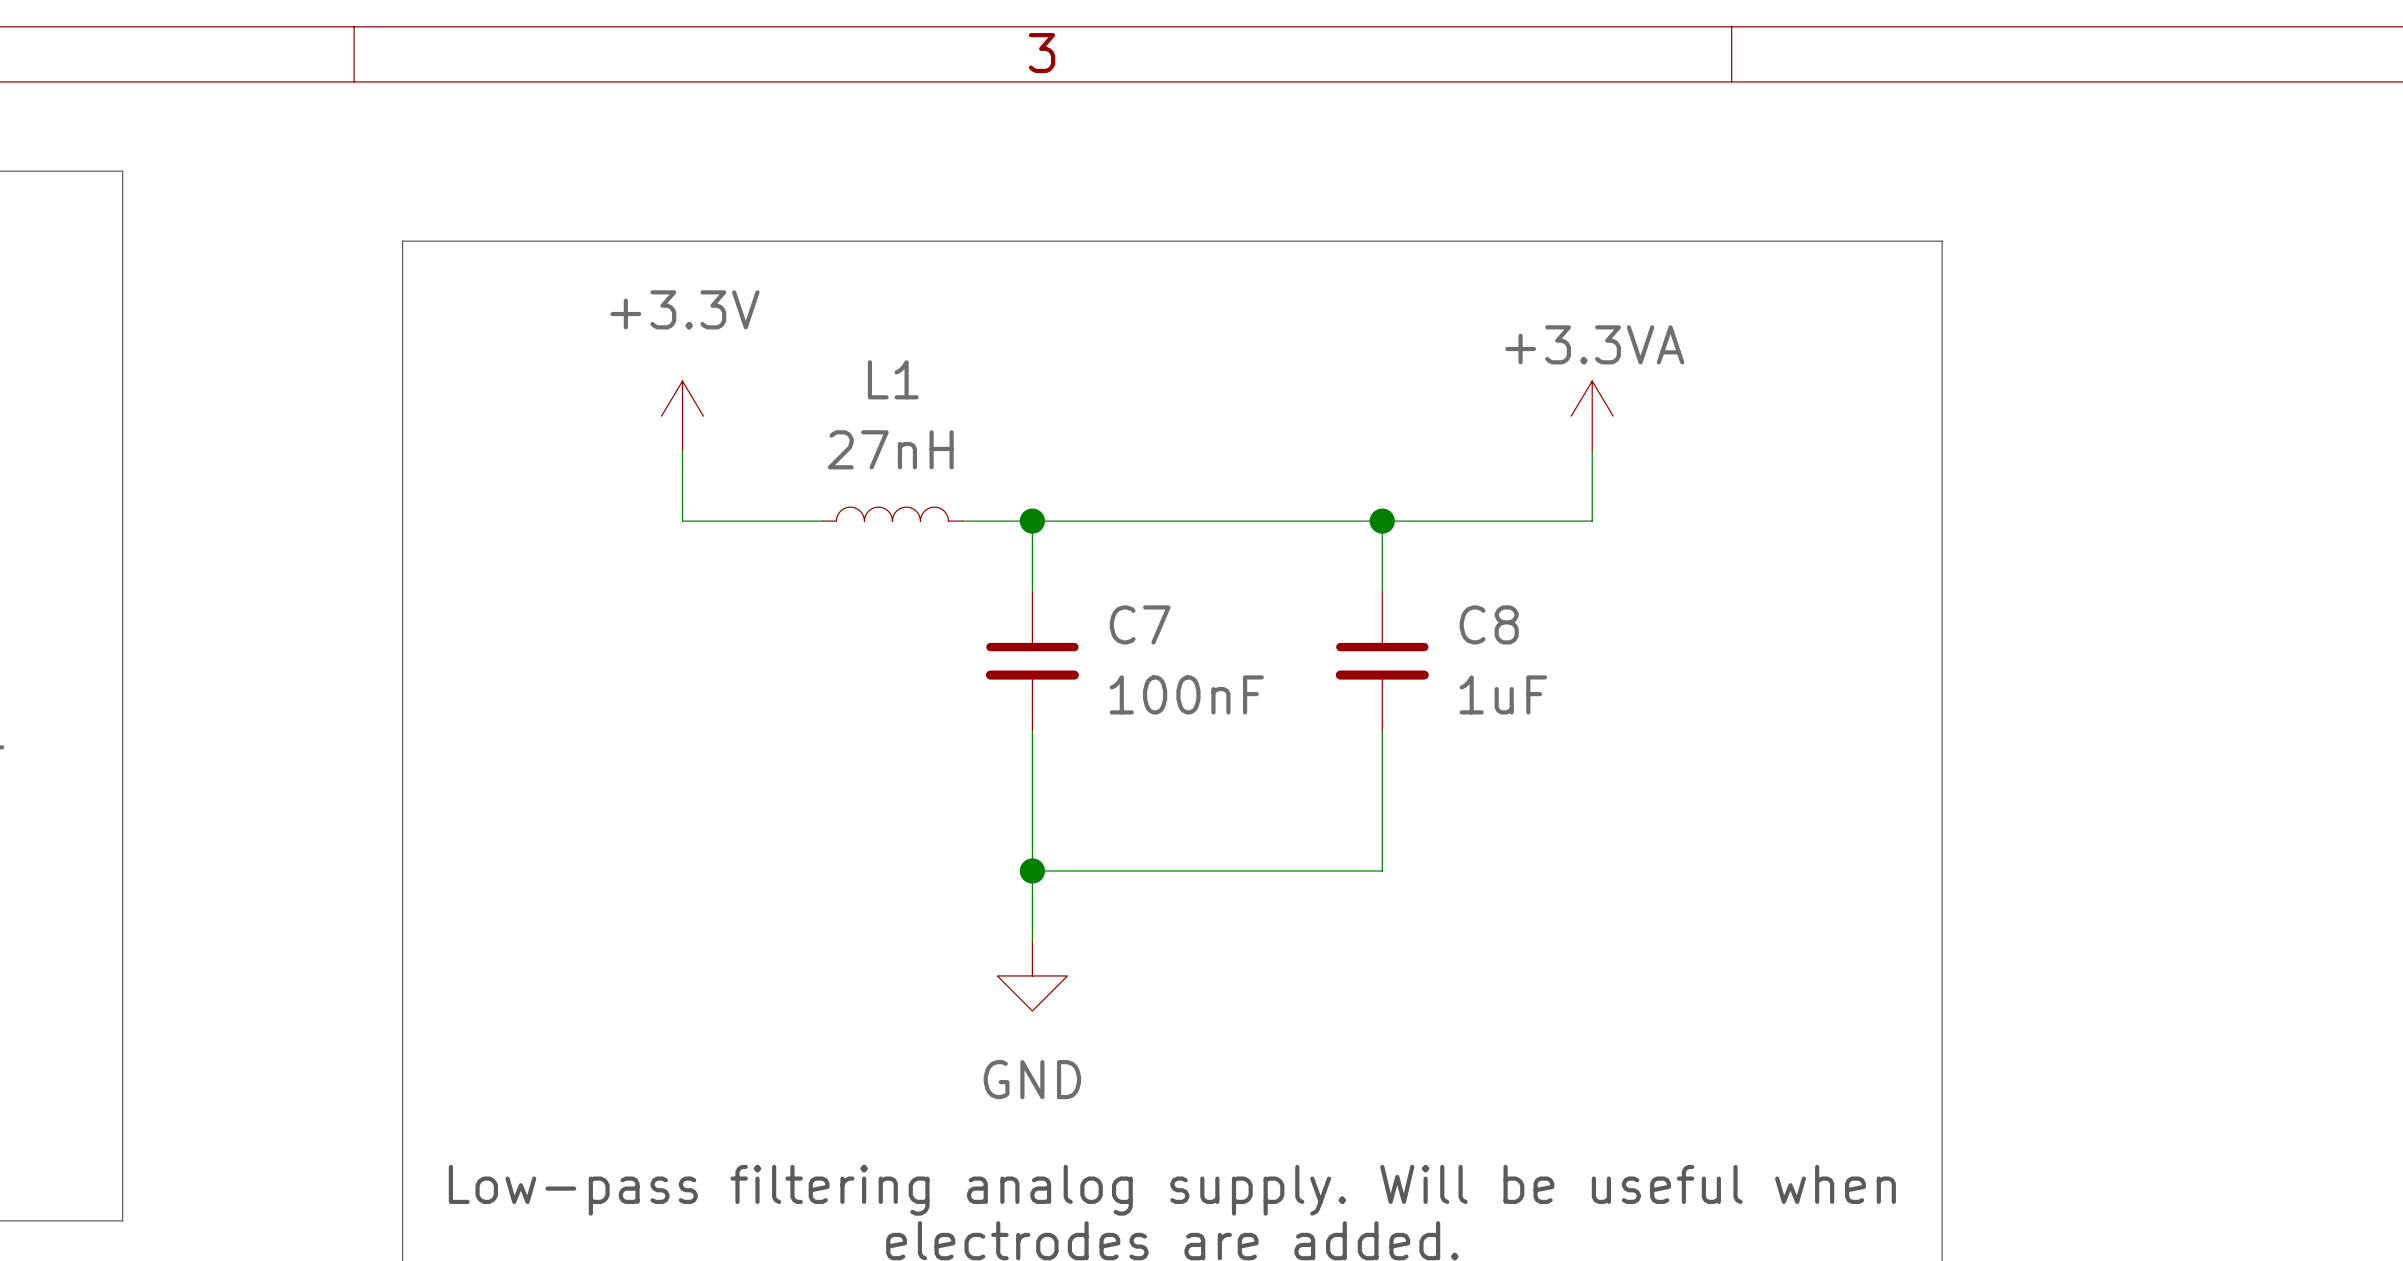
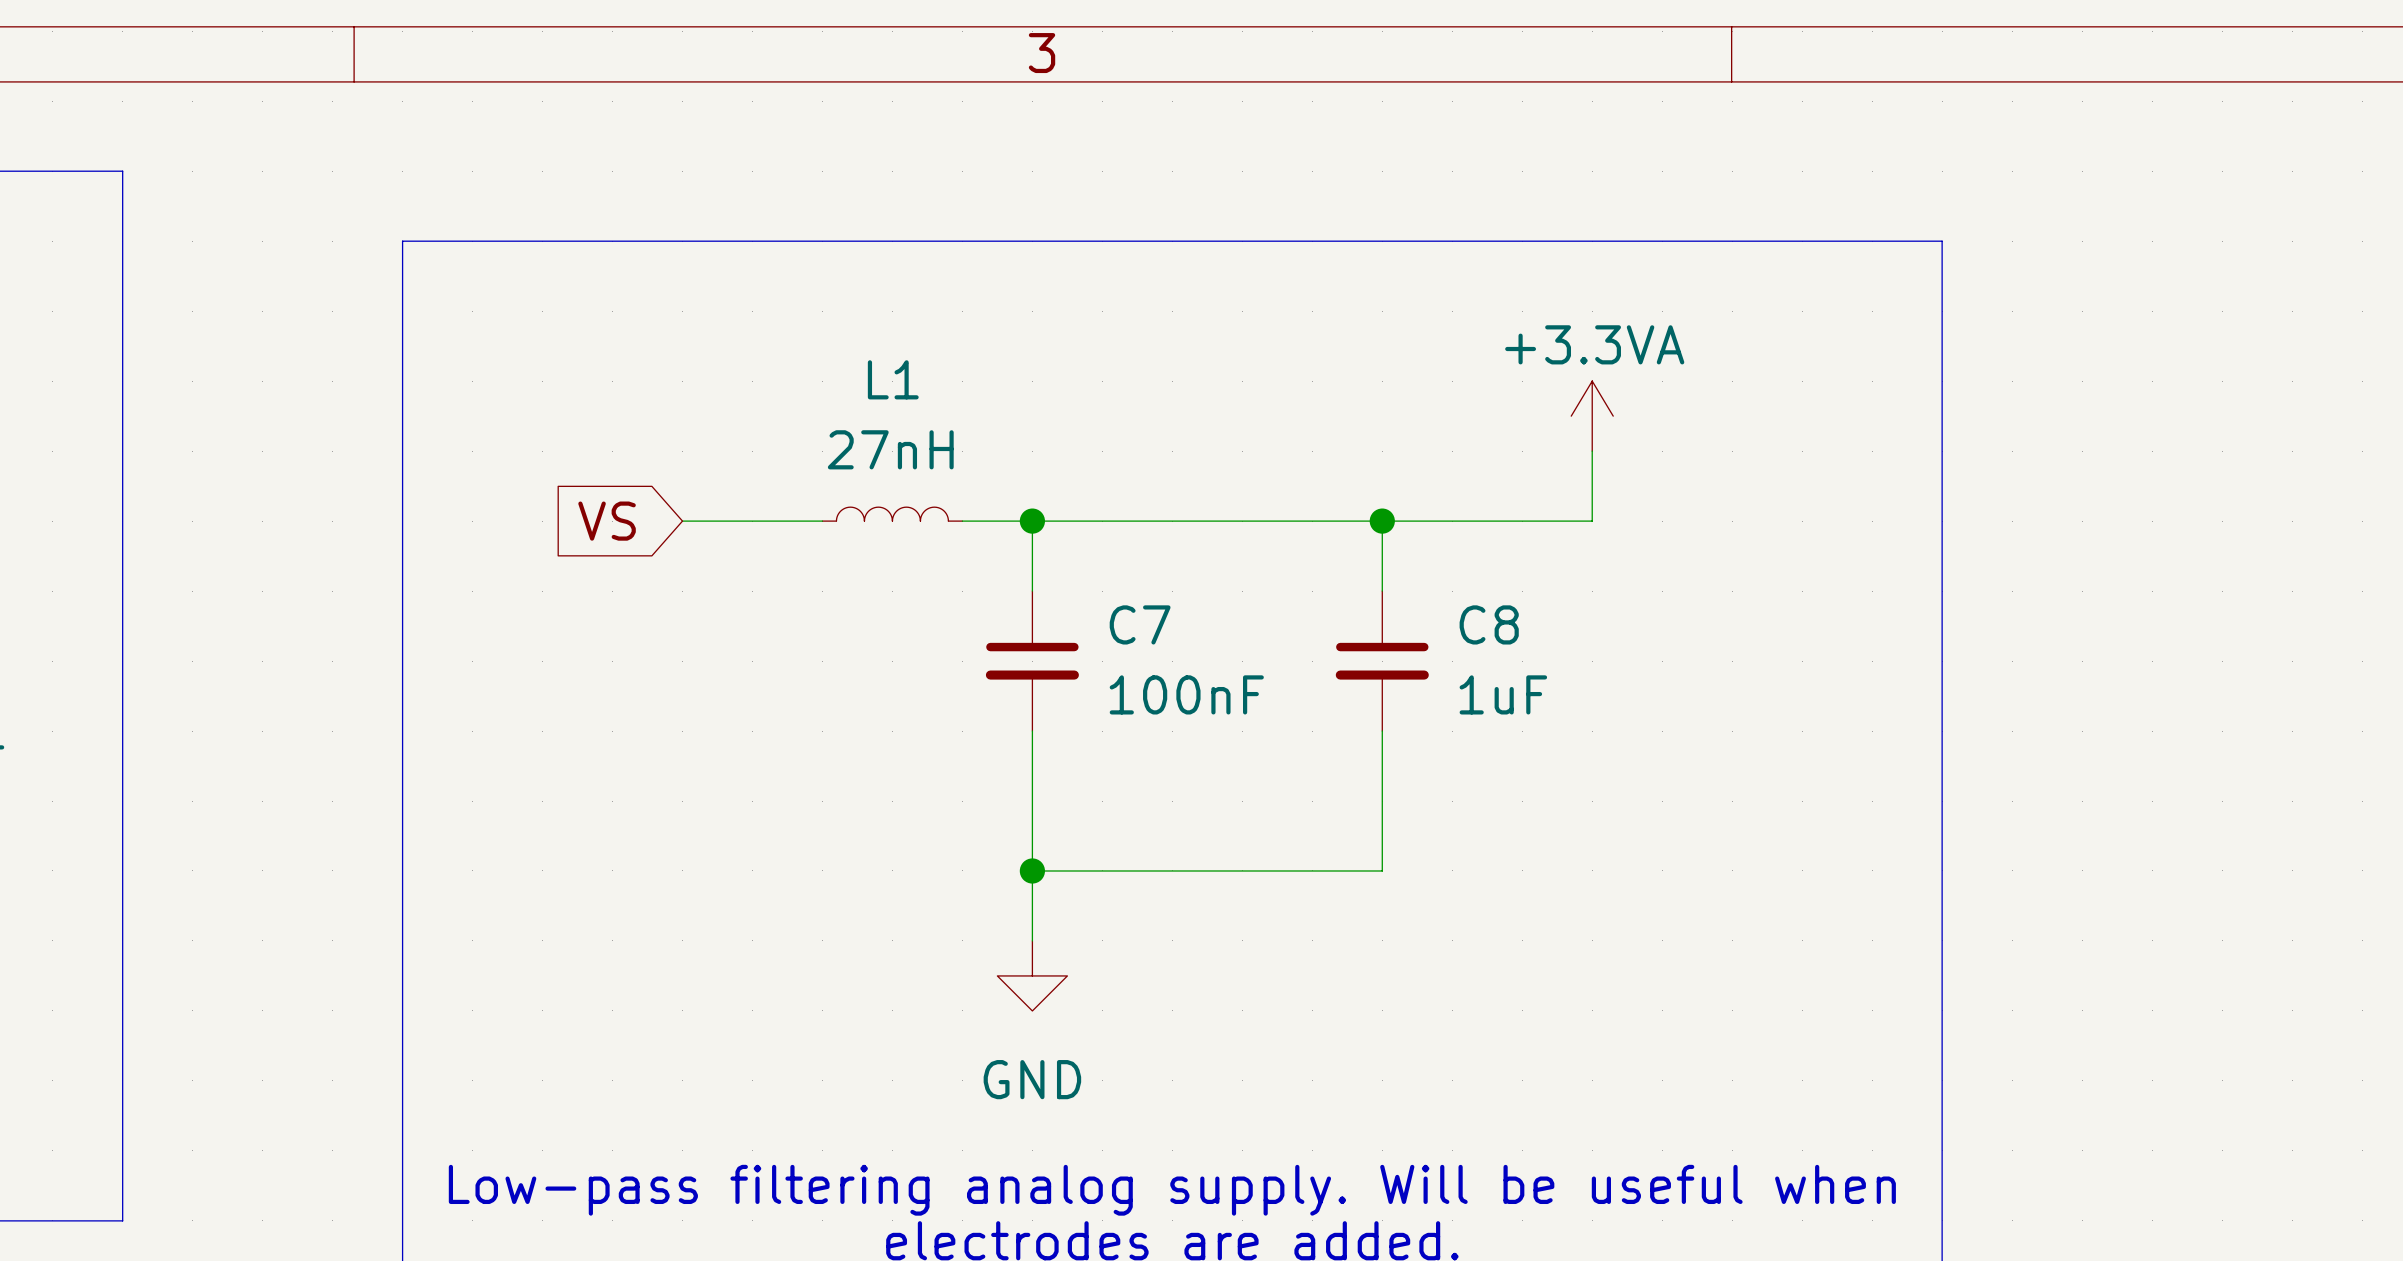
power symbol: +3.3V (682, 416) -> none
wire: (682, 451) (682, 521) -> none
global label: none -> VS (607, 521)

